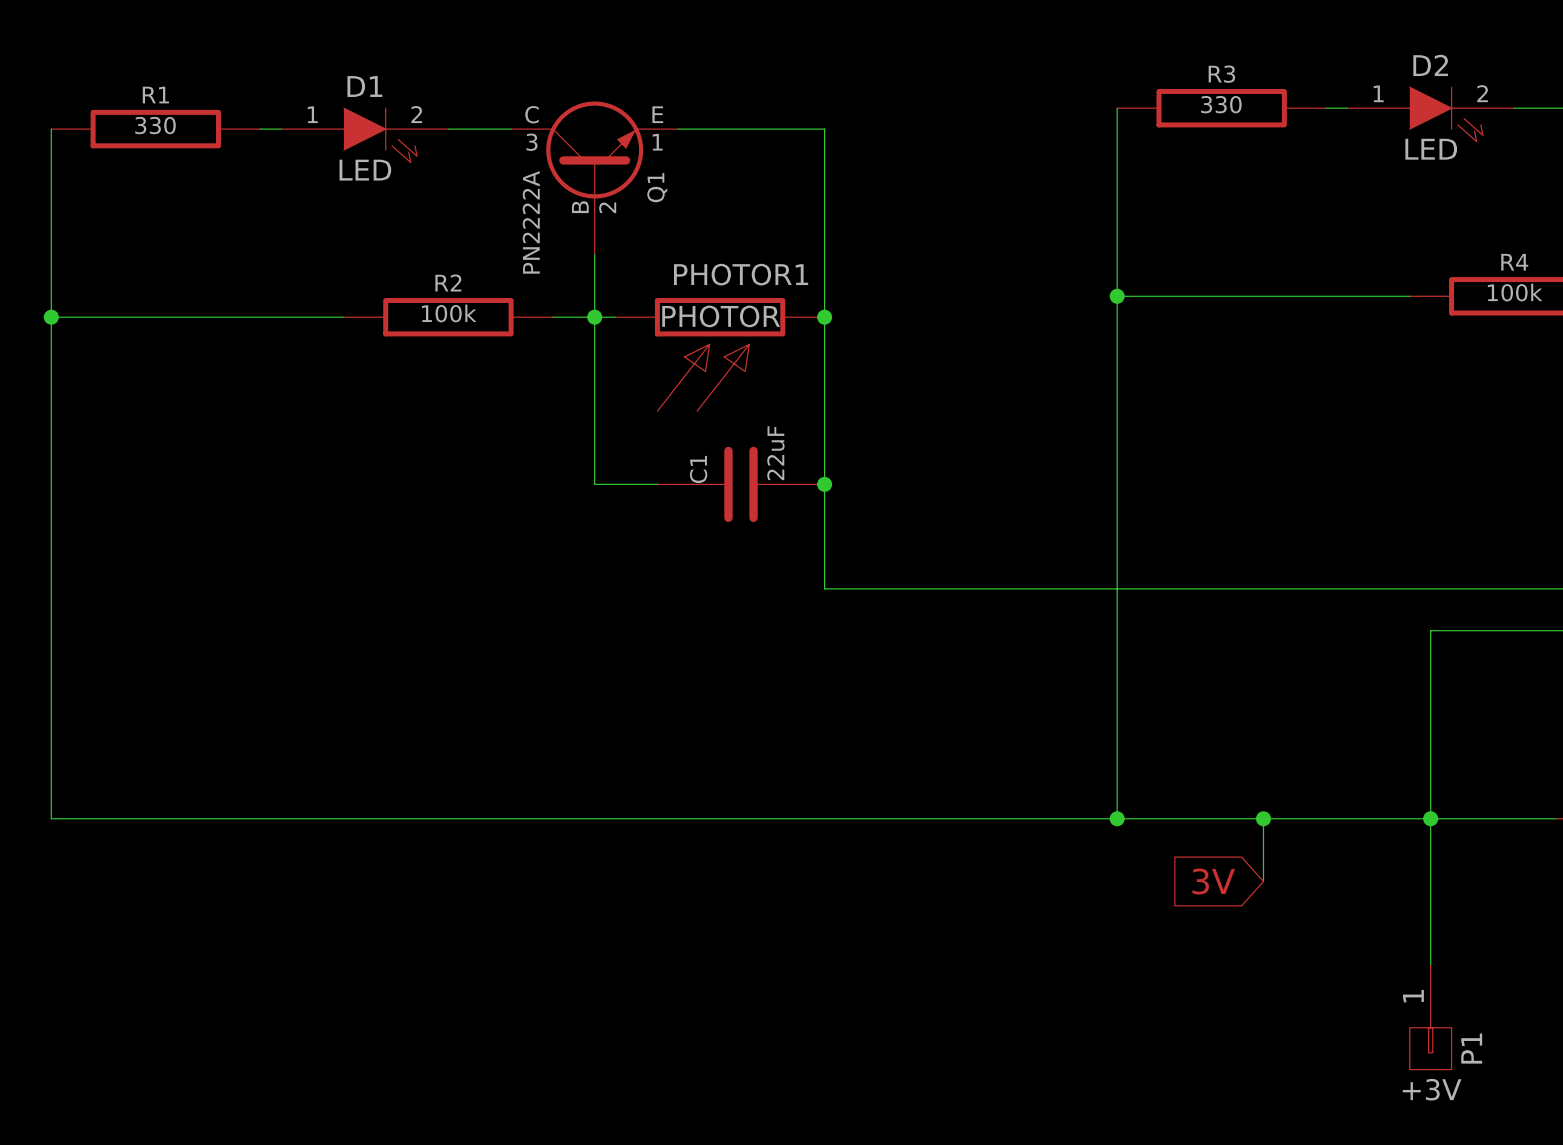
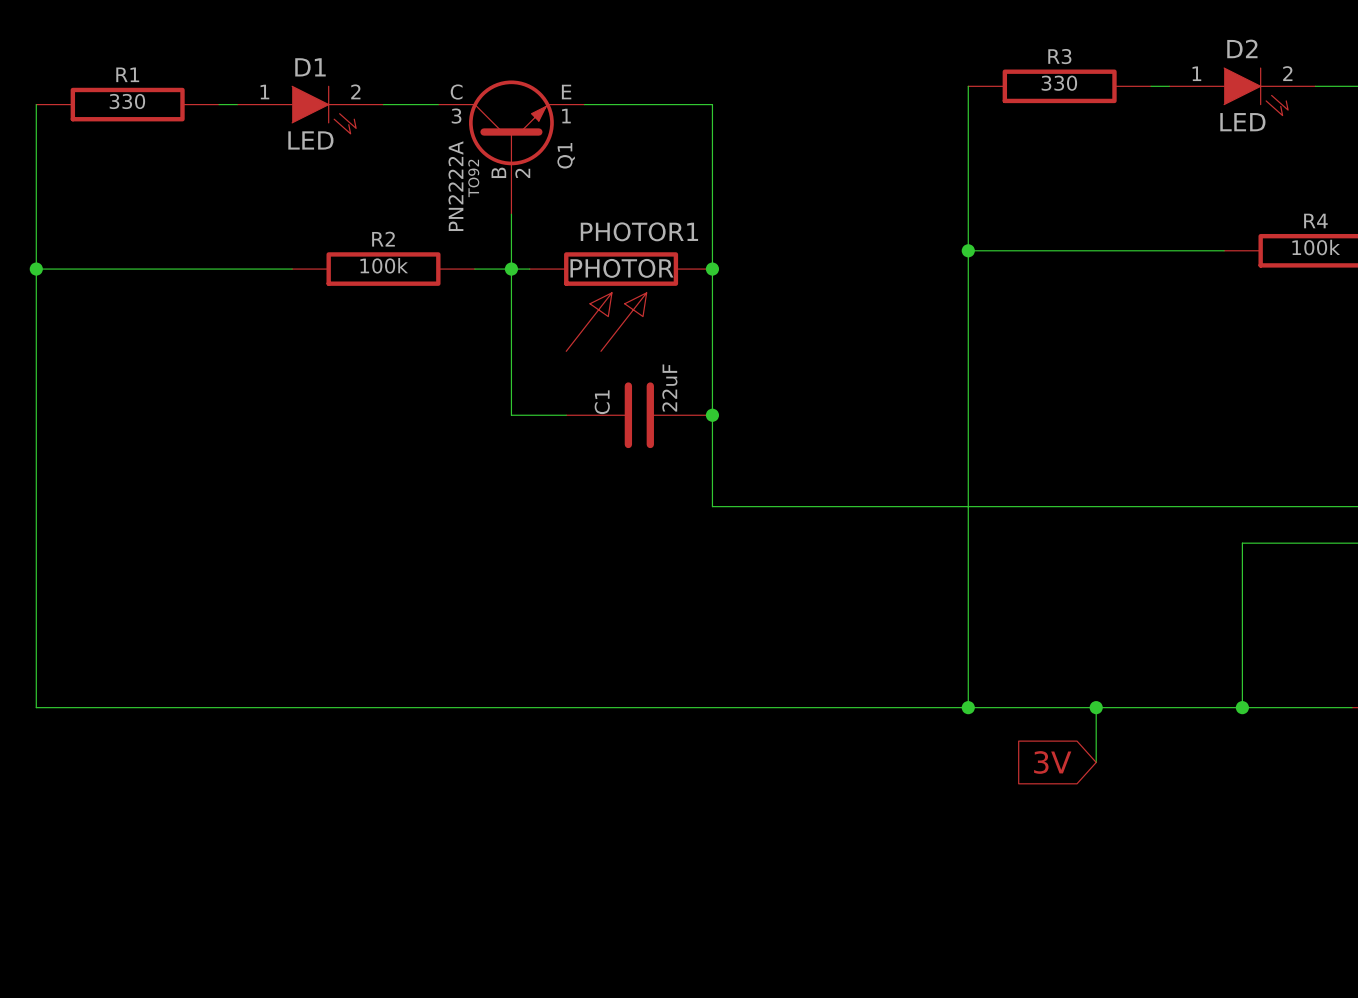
Q1 text: none -> TO92 (473, 178)
wire: (1430, 818) (1430, 965) -> none
P1: +3V (1430, 1017) -> none

